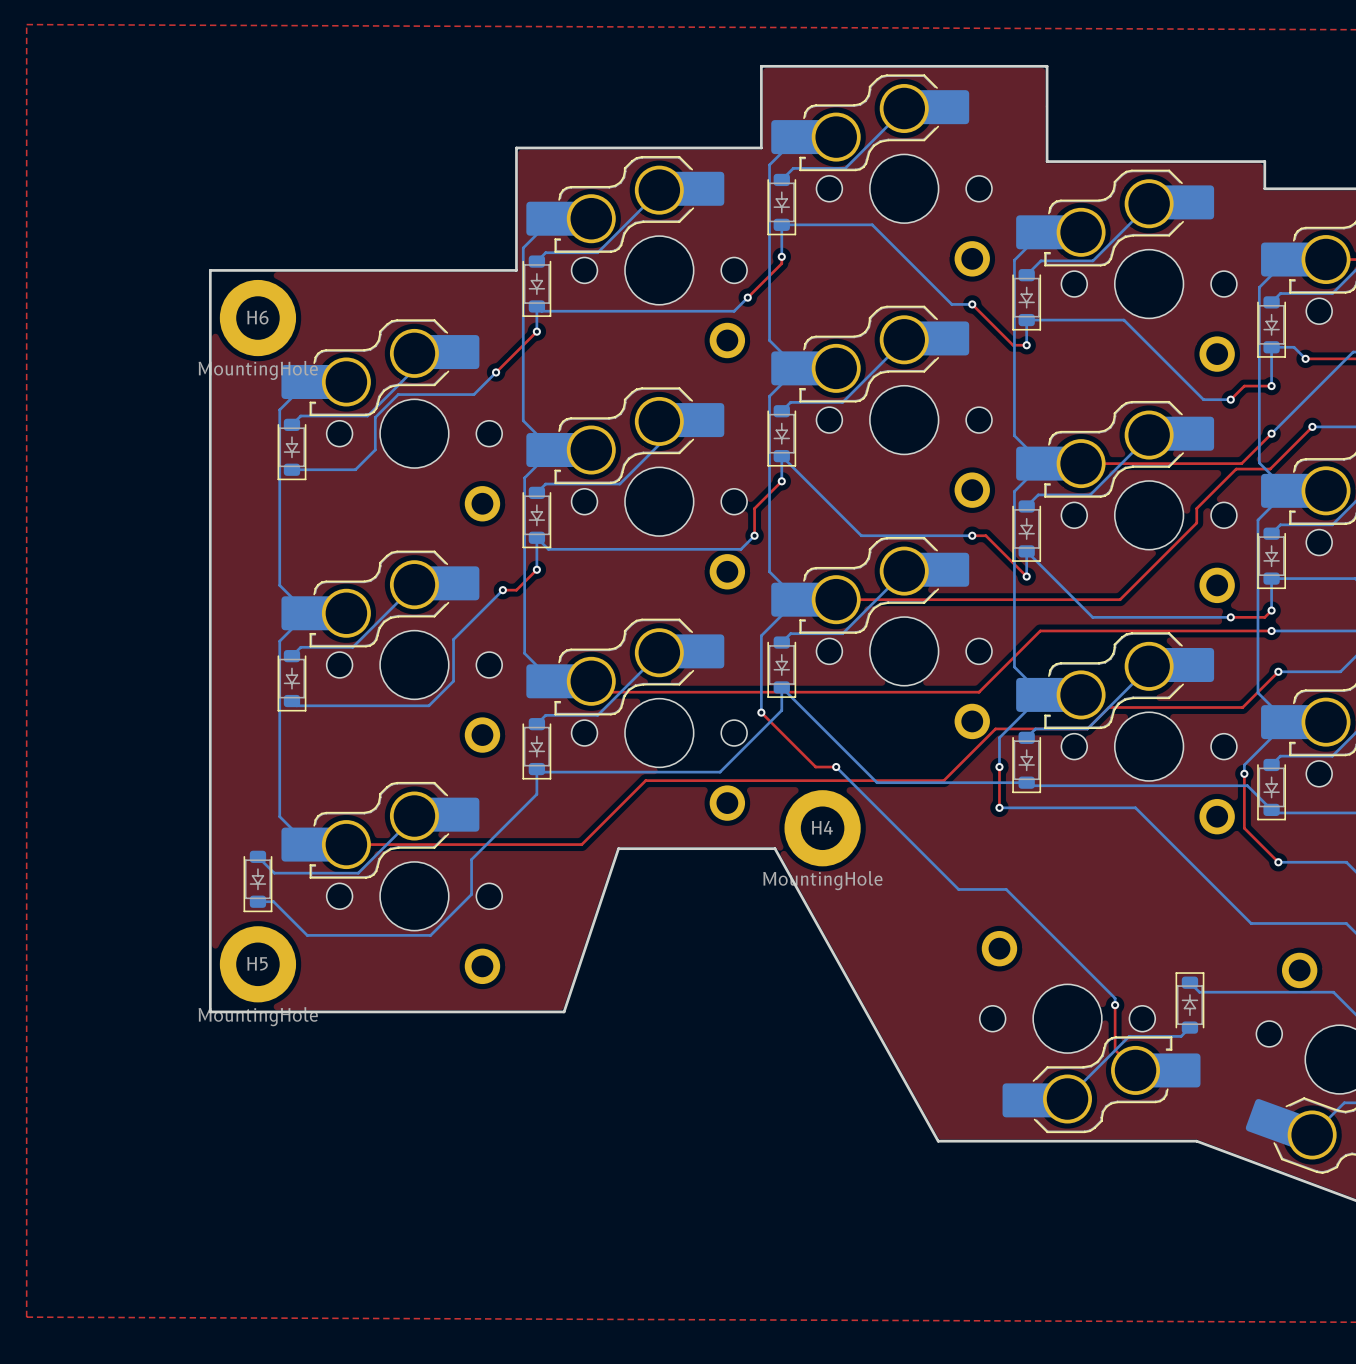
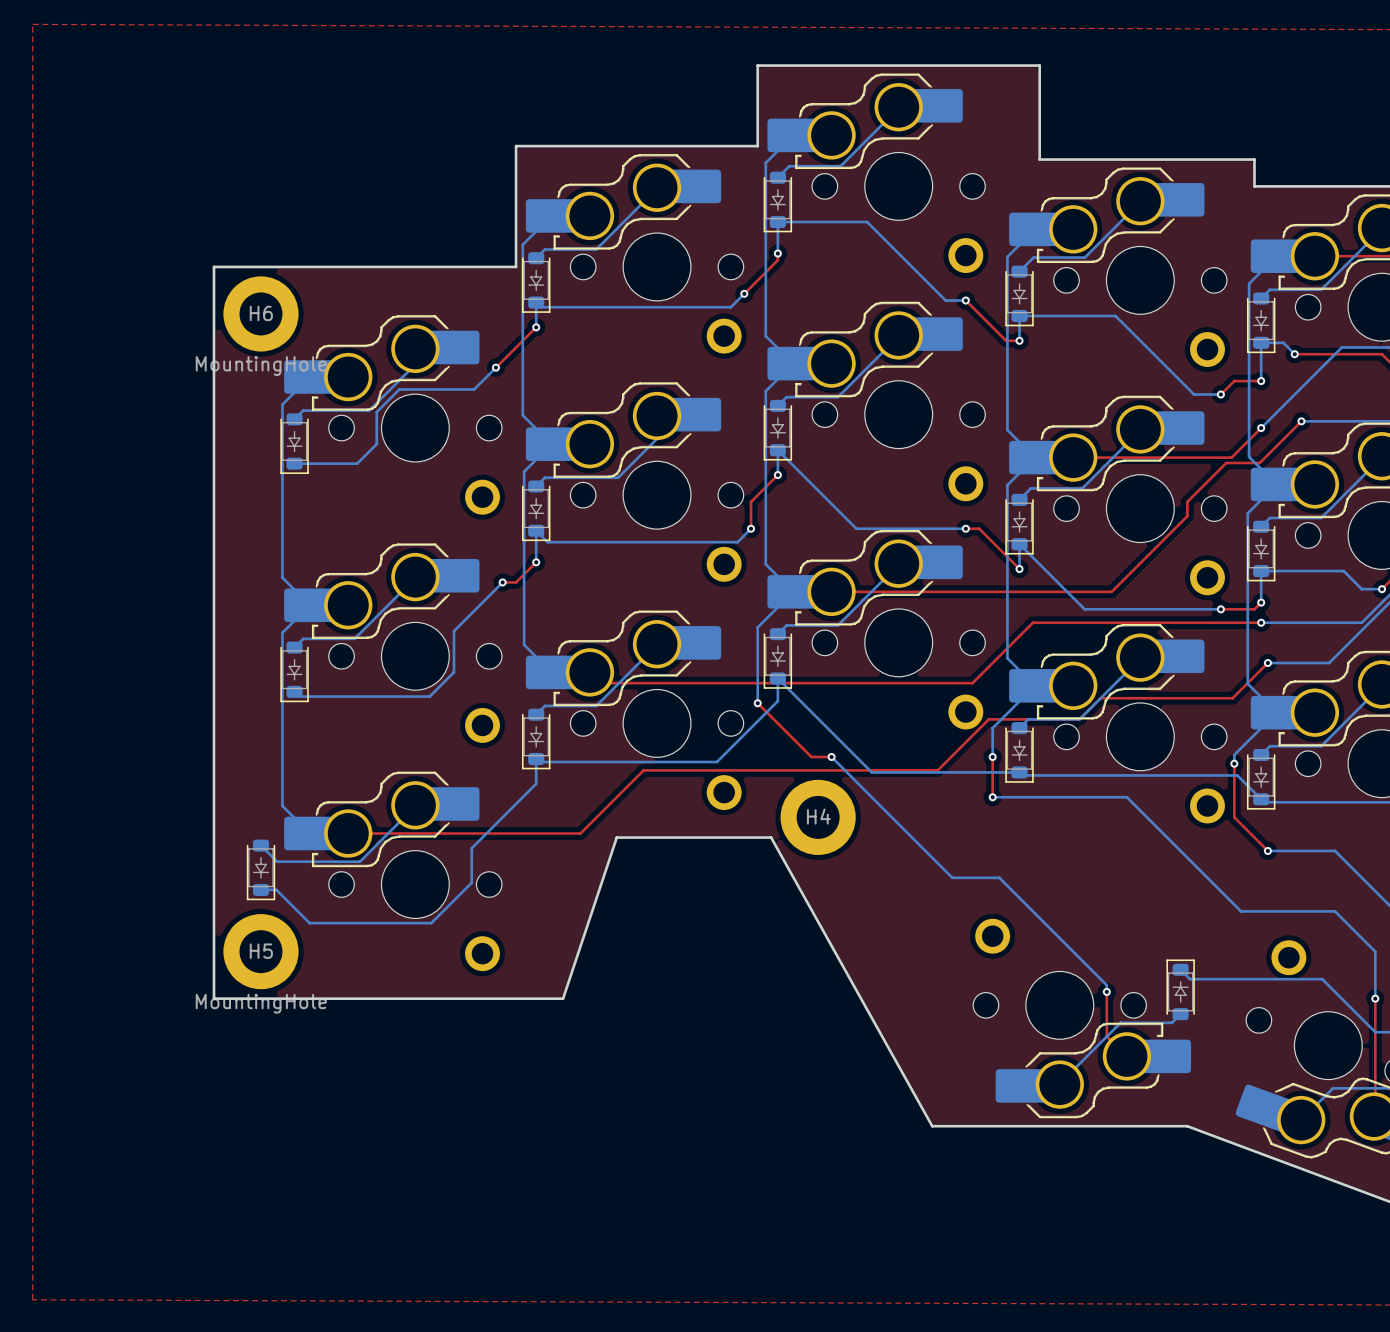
H4 value: MountingHole (822, 880) -> none

